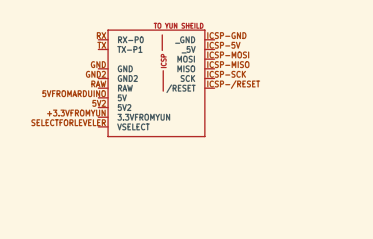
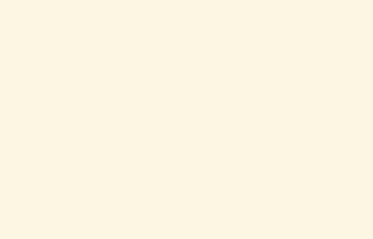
part: (156, 83) -> none

